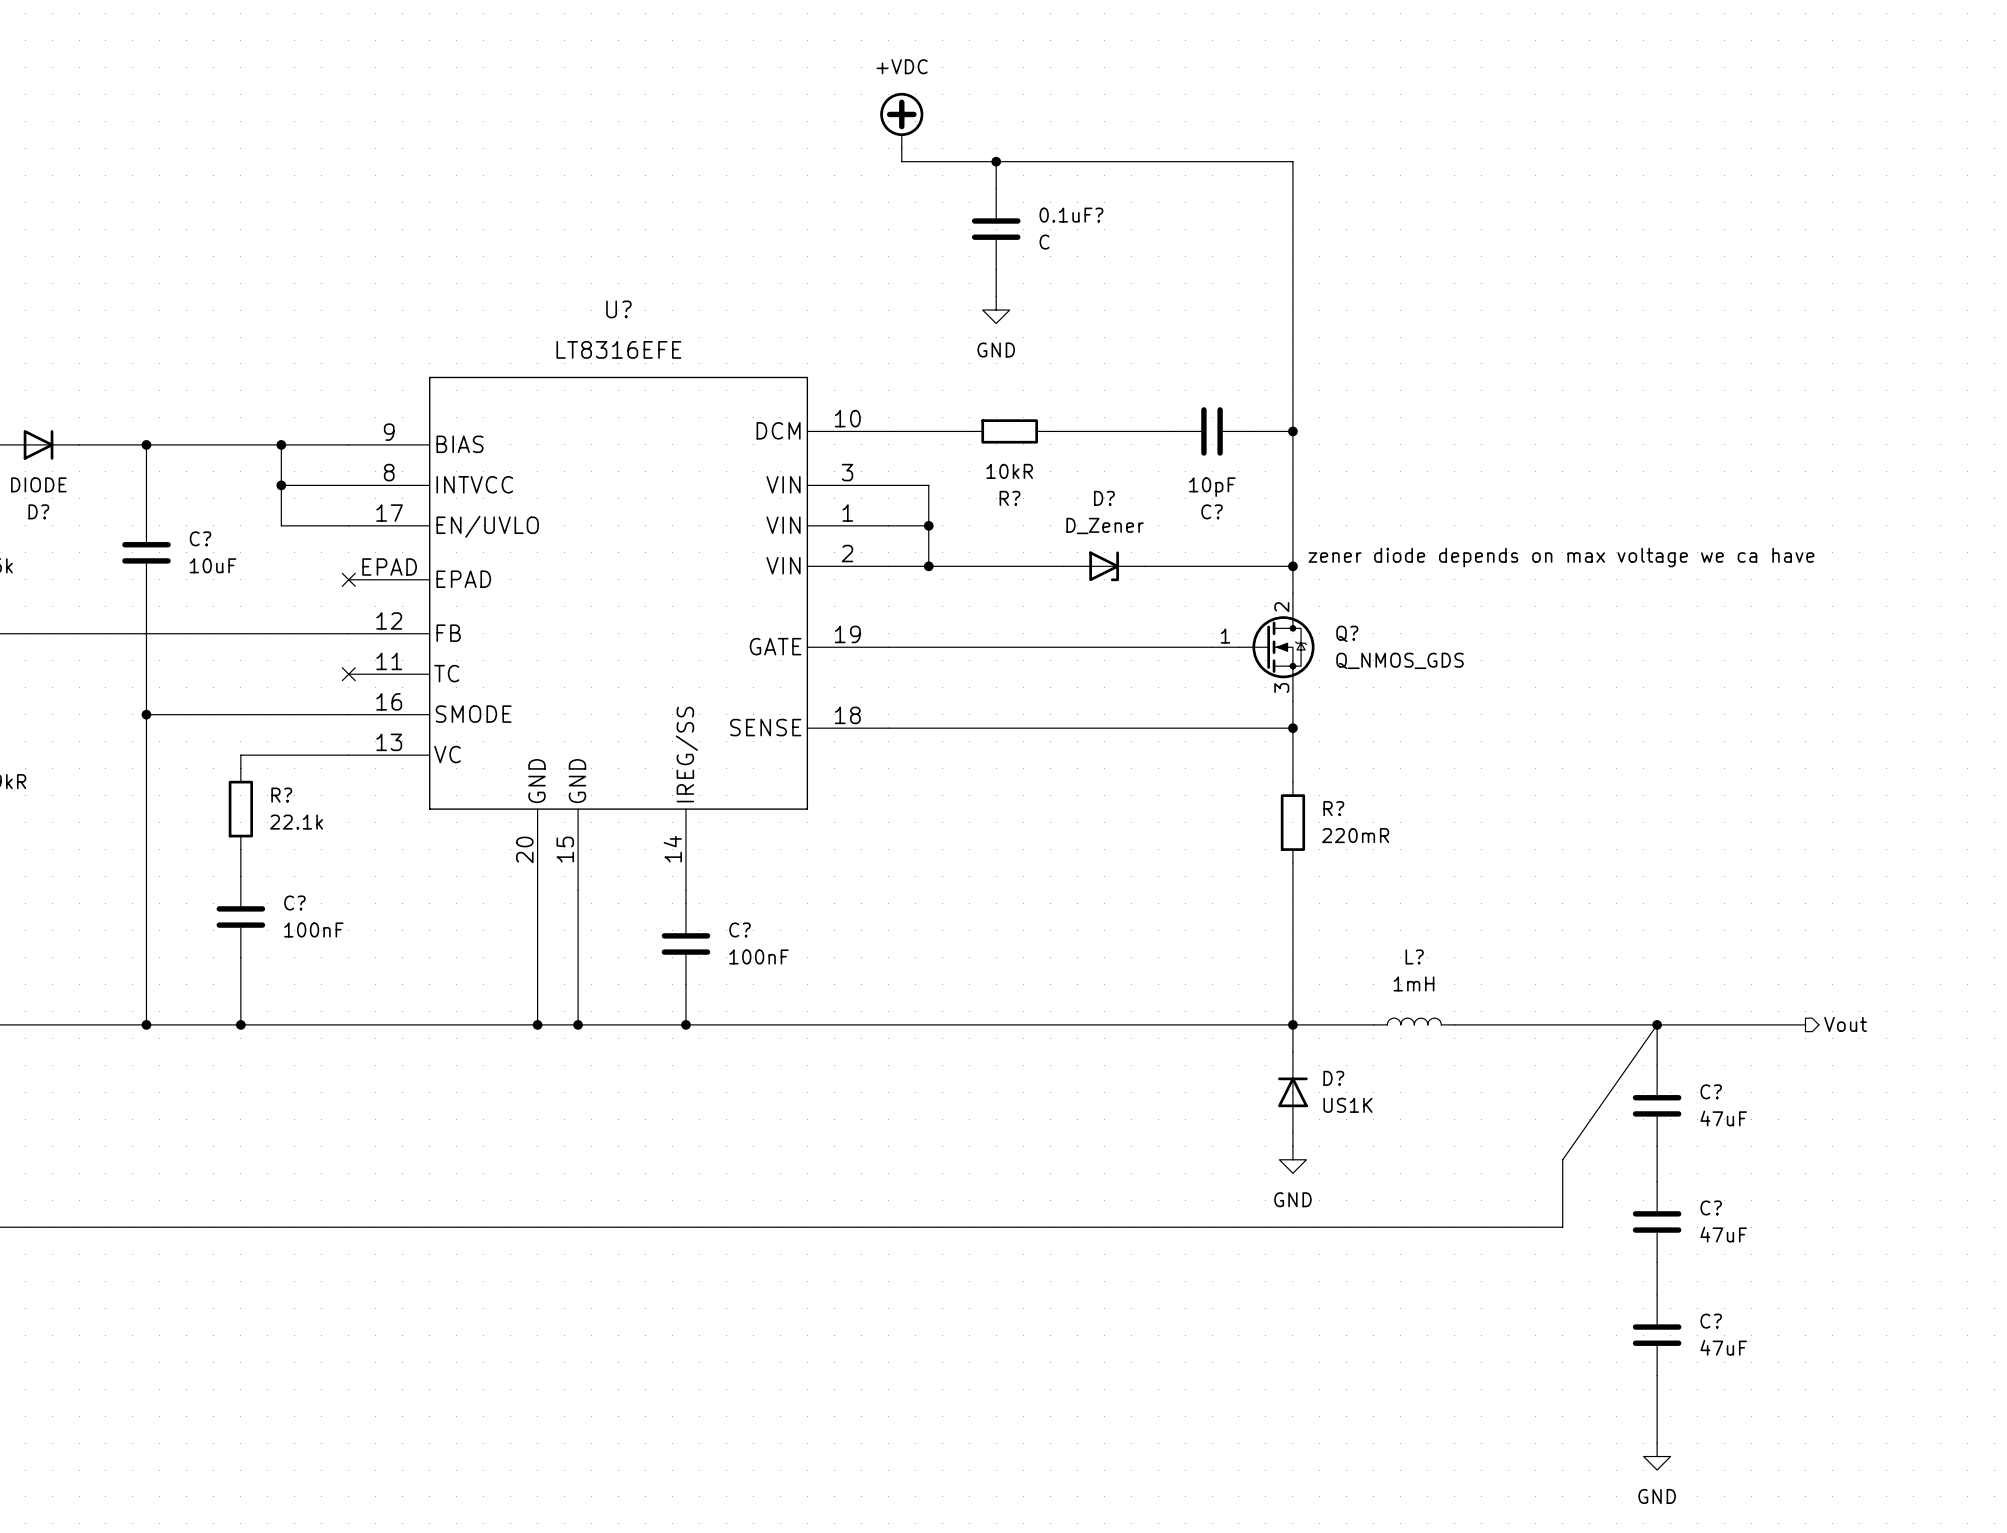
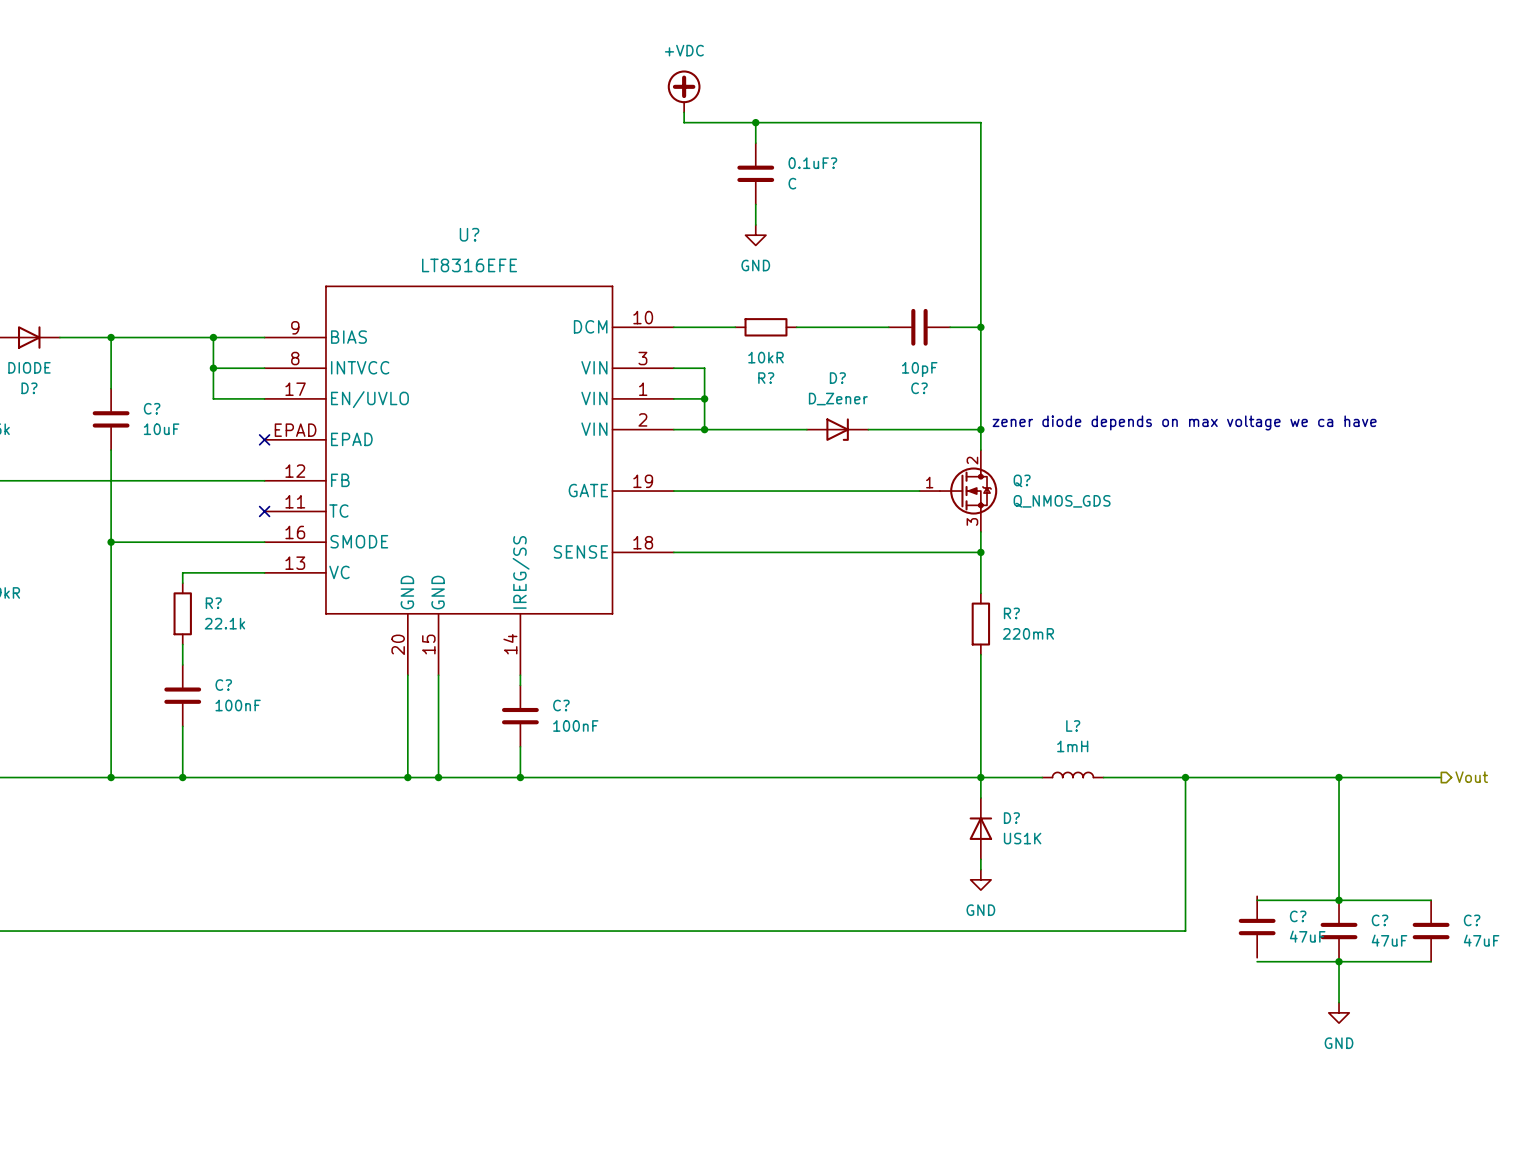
junction: none -> (1185, 777)
junction: (1657, 1024) -> none
wire: none -> (1339, 777) (1339, 900)
junction: none -> (1339, 777)
wire: none -> (1369, 777) (1441, 777)
hierarchical label position: Vout (1845, 1024) -> Vout (1471, 777)
wire: (1657, 1065) (1657, 1024) (1562, 1159) -> (1185, 777) (1185, 879)
C?: 47uF (1657, 1105) -> none
wire: (1657, 1146) (1657, 1181) -> none
wire: none -> (1257, 900) (1431, 900)
junction: none -> (1339, 900)
C?: none -> 47uF (1339, 931)
C?: none -> 47uF (1431, 931)
wire: (1657, 1262) (1657, 1294) -> none
wire: none -> (1257, 961) (1431, 961)
wire: none -> (1339, 961) (1339, 1002)
junction: none -> (1339, 961)
C?: 47uF (1657, 1335) -> none
wire: (1657, 1375) (1657, 1443) -> none
power symbol position: GND (1657, 1456) -> GND (1339, 1012)

